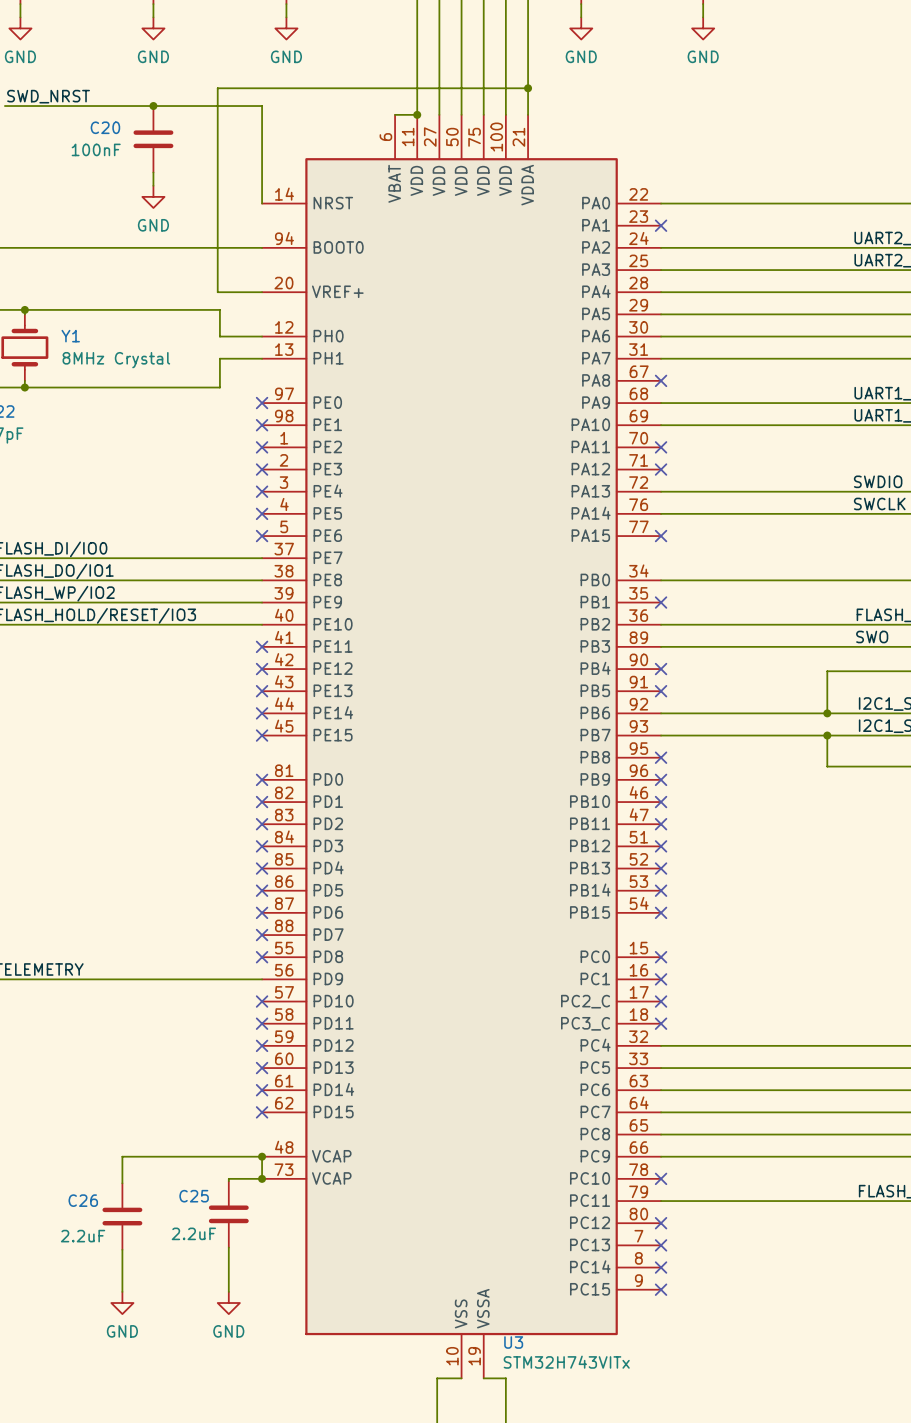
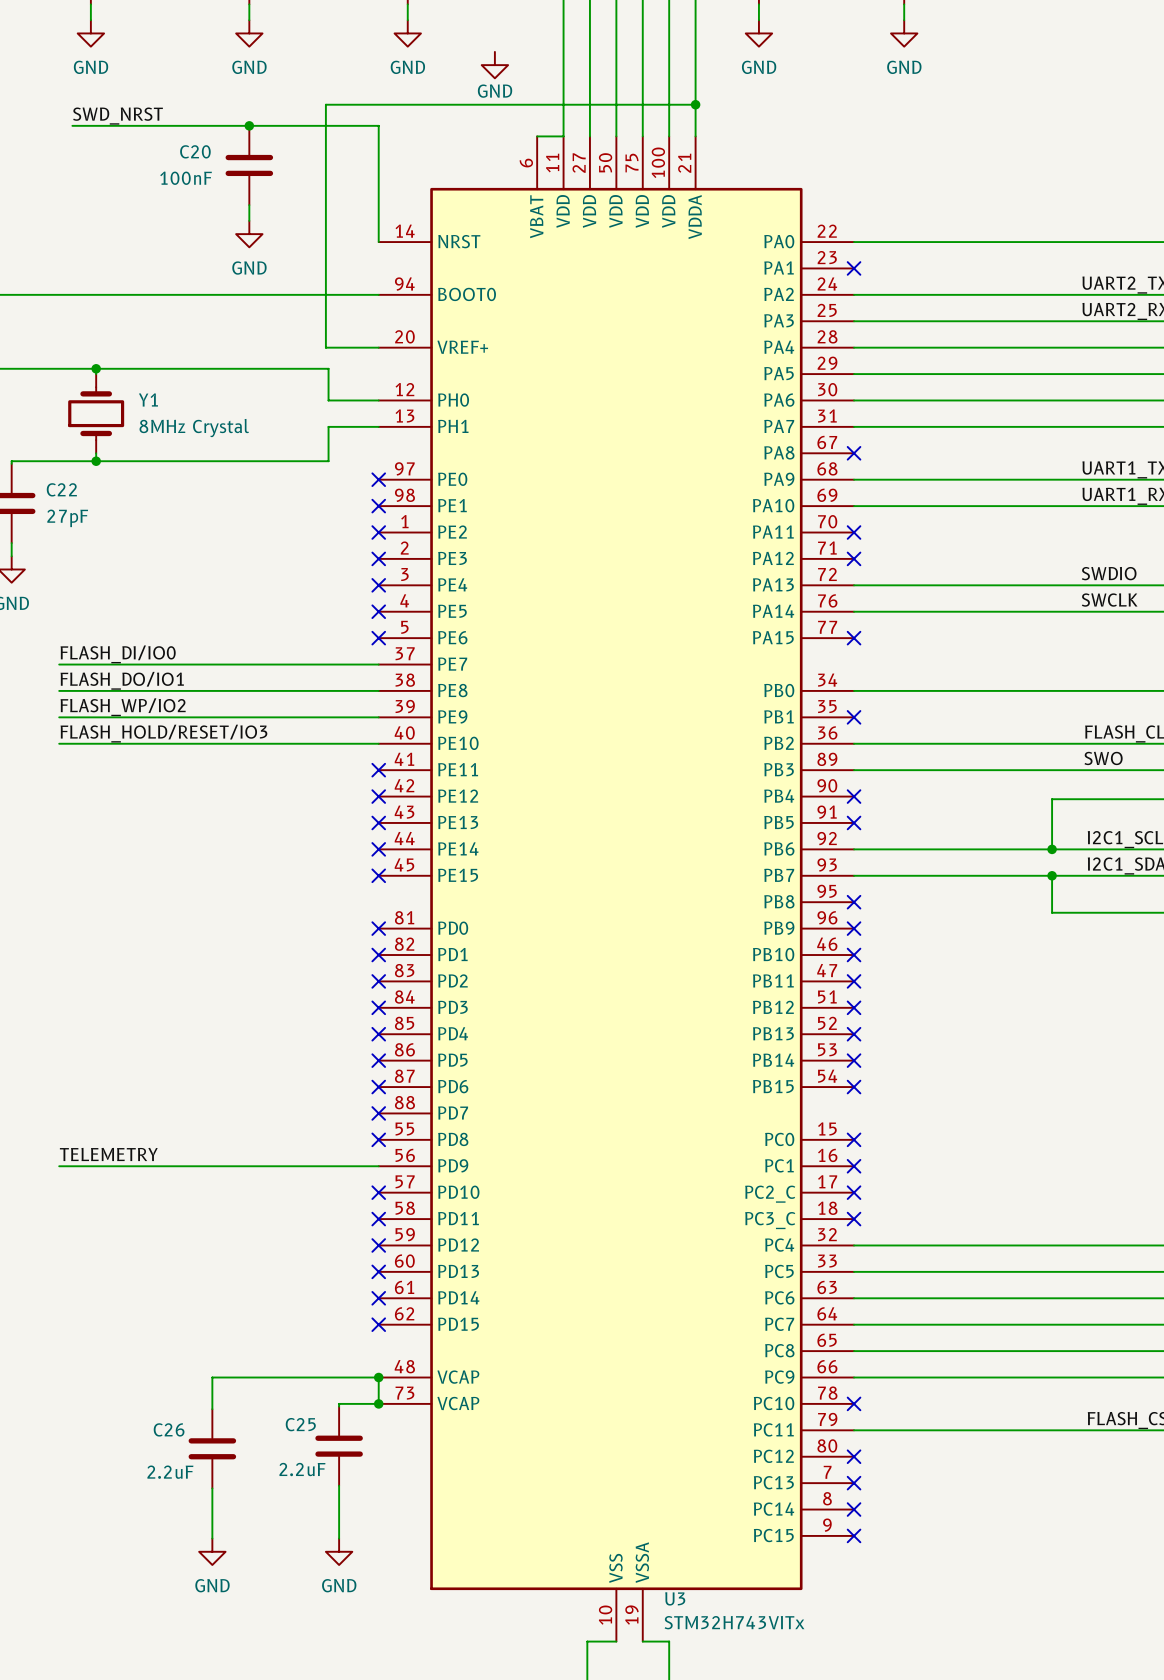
power symbol: none -> GND (494, 65)
junction: (417, 114) -> none

